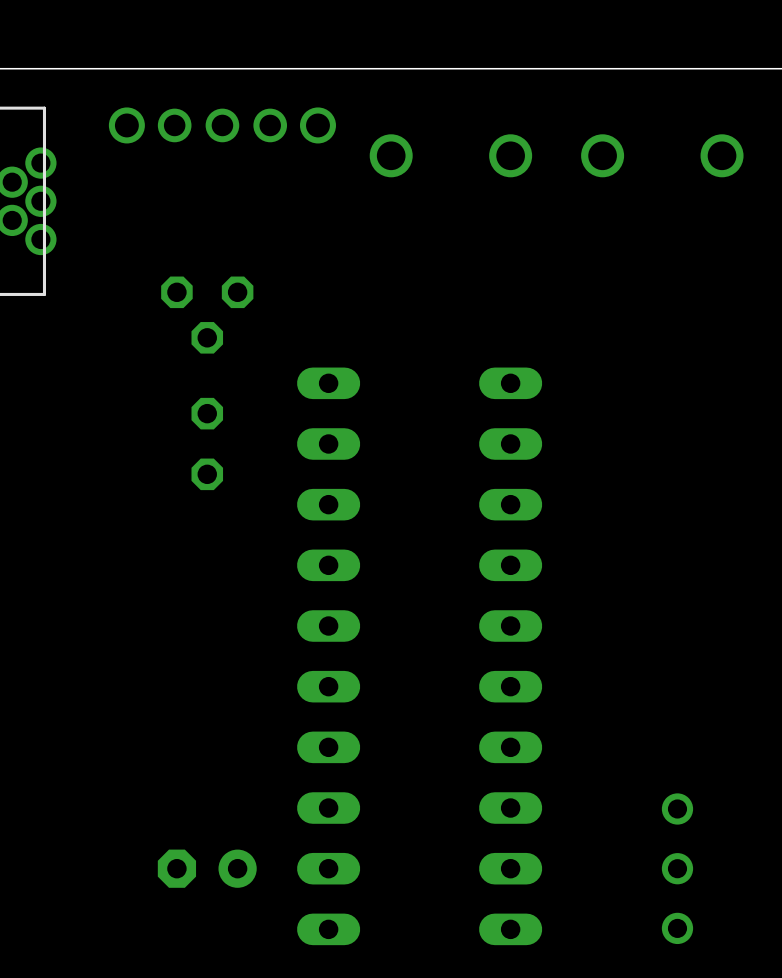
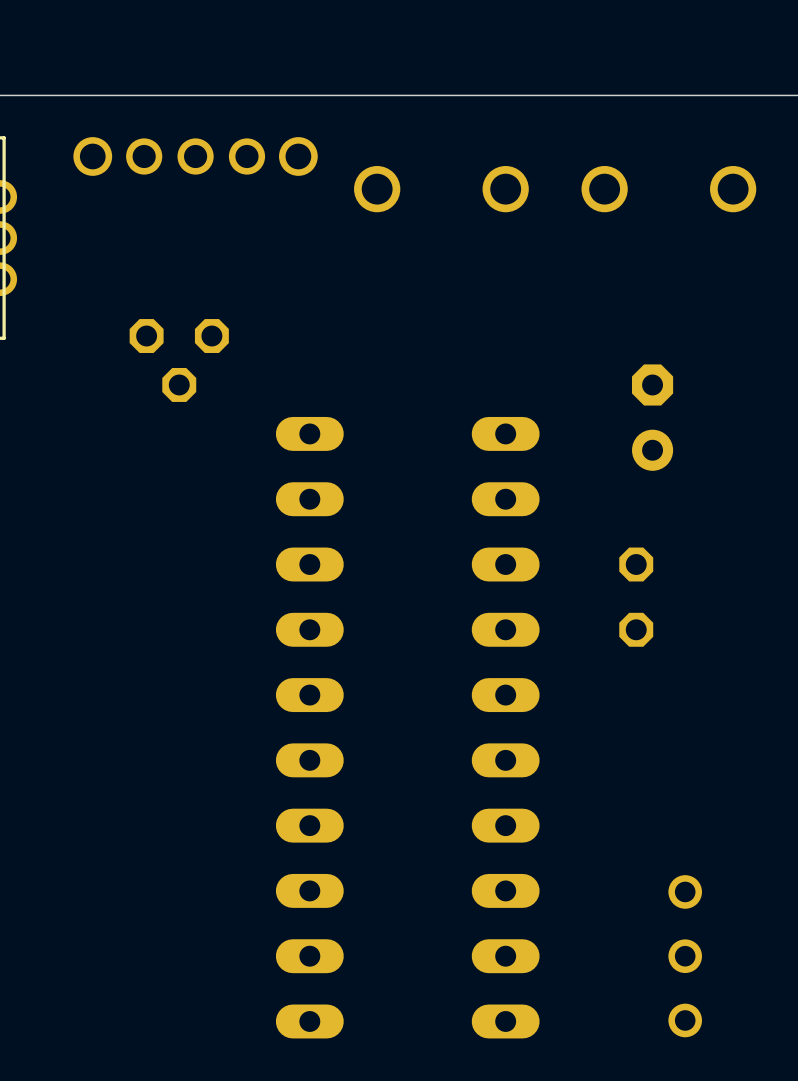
part: none -> (652, 417)
part: (207, 443) -> none
part: none -> (636, 597)
part: (207, 868) -> none

